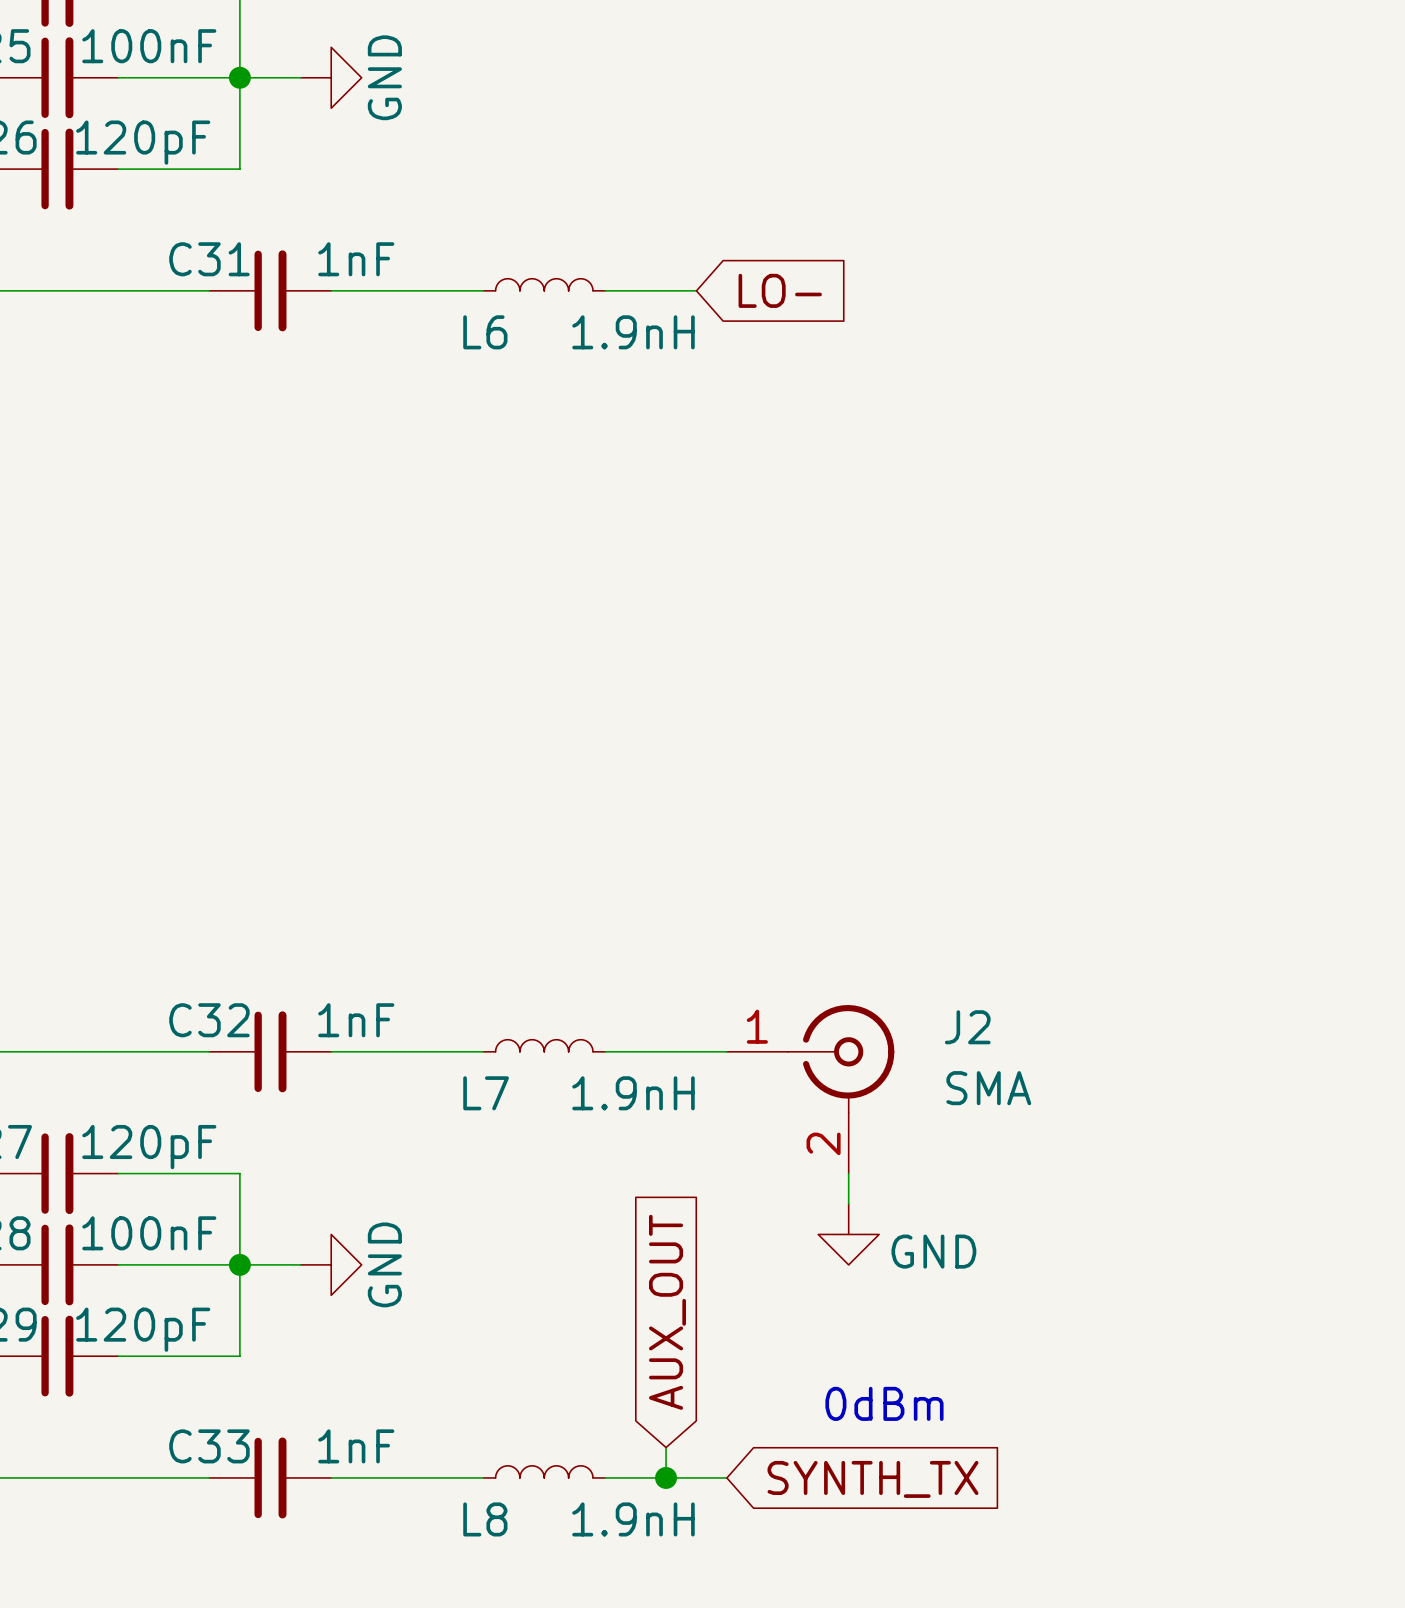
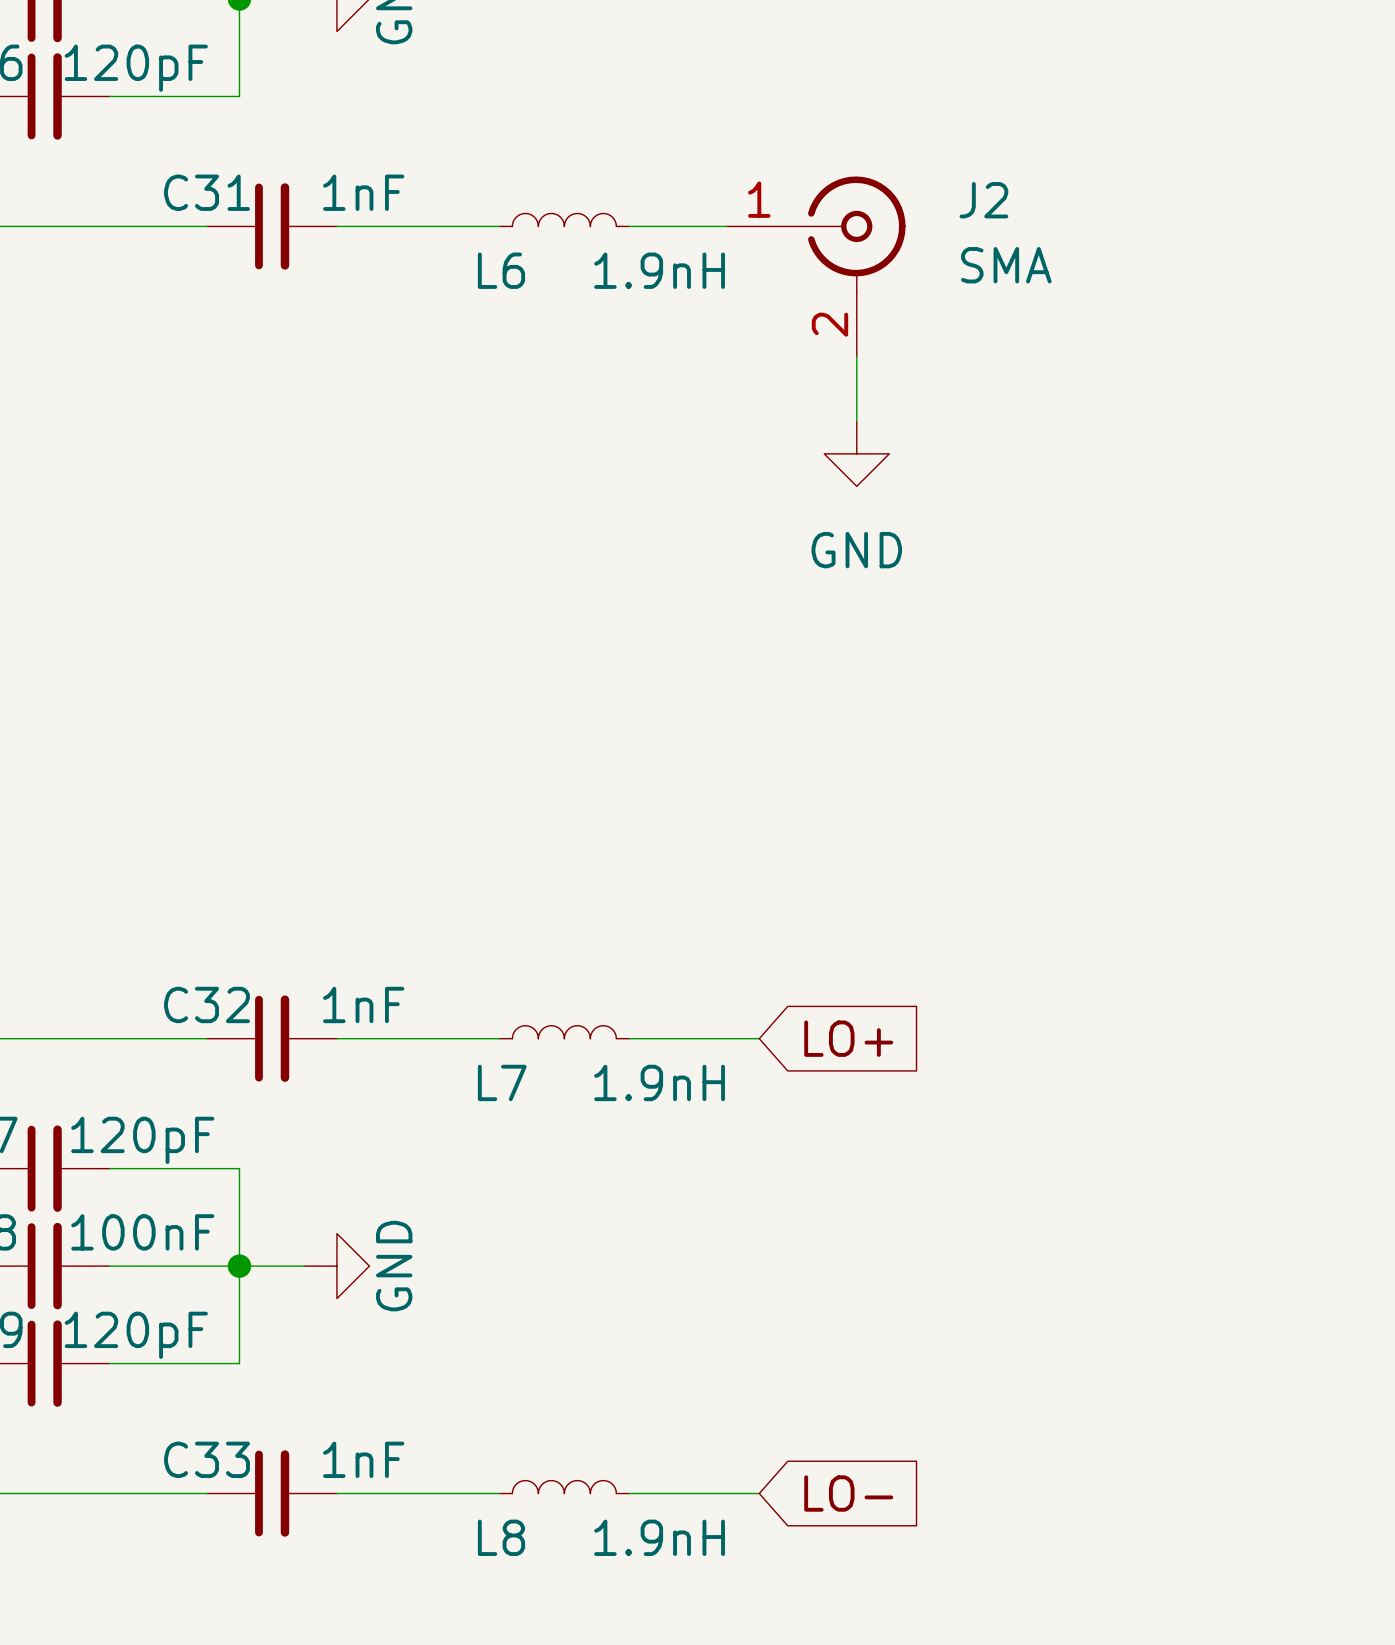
global label: LO- (780, 290) -> none
wire: none -> (856, 356) (856, 421)
power symbol: none -> GND (856, 453)
global label: none -> LO+ (848, 1038)
J2 position: (810, 1089) -> (816, 266)
wire: (848, 1173) (848, 1204) -> none
power symbol: GND (848, 1234) -> none
global label: AUX_OUT (667, 1312) -> none
text: 0dBm (884, 1403) -> none
wire: (666, 1447) (666, 1477) -> none
junction: (666, 1477) -> none
global label: SYNTH_TX (873, 1479) -> LO- (848, 1493)

